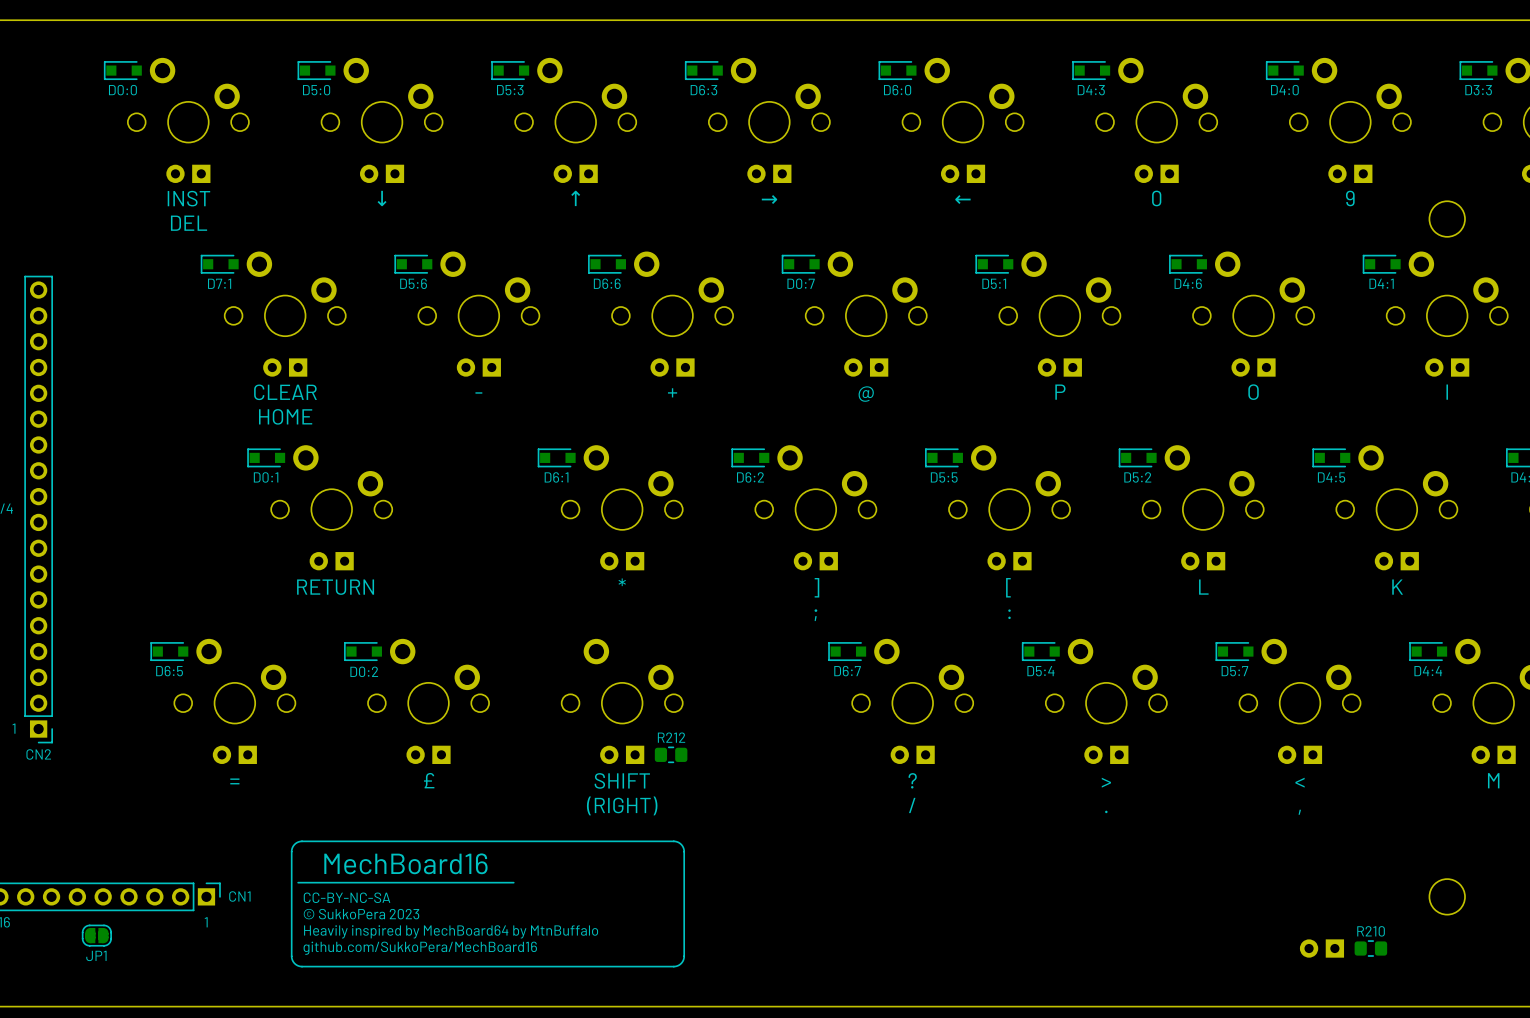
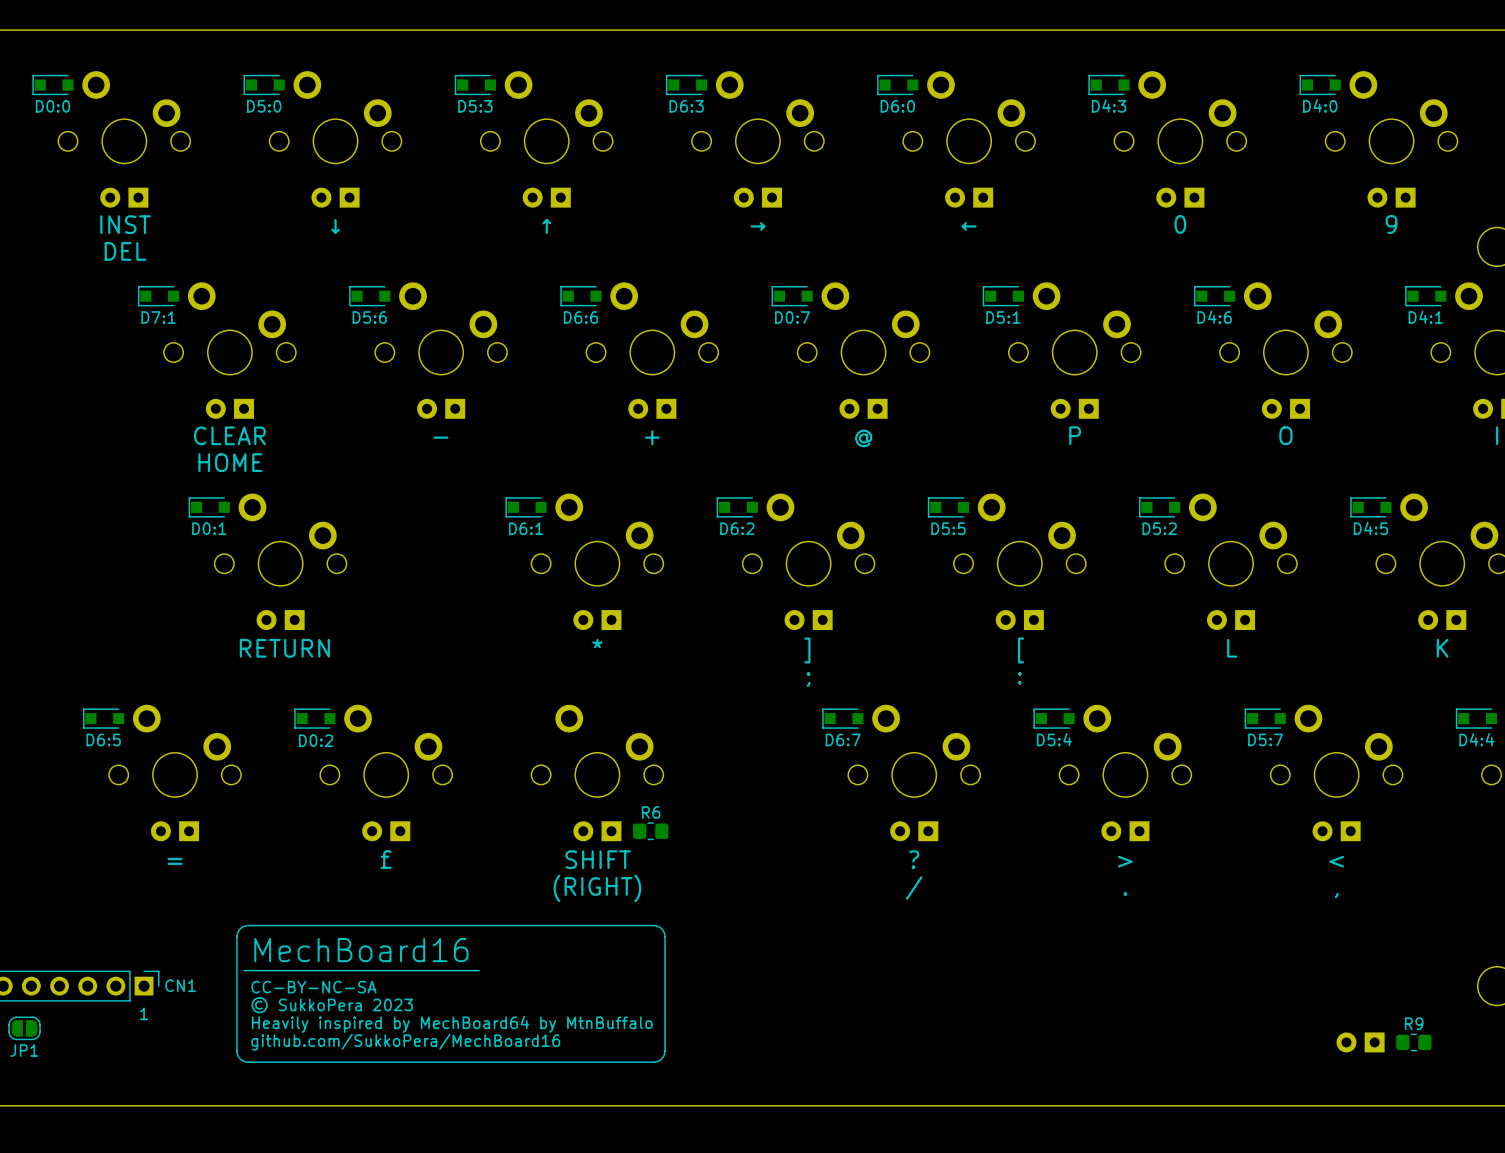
R212 name: R212 (671, 737) -> R6 (651, 812)
R210 name: R210 (1371, 931) -> R9 (1414, 1023)

